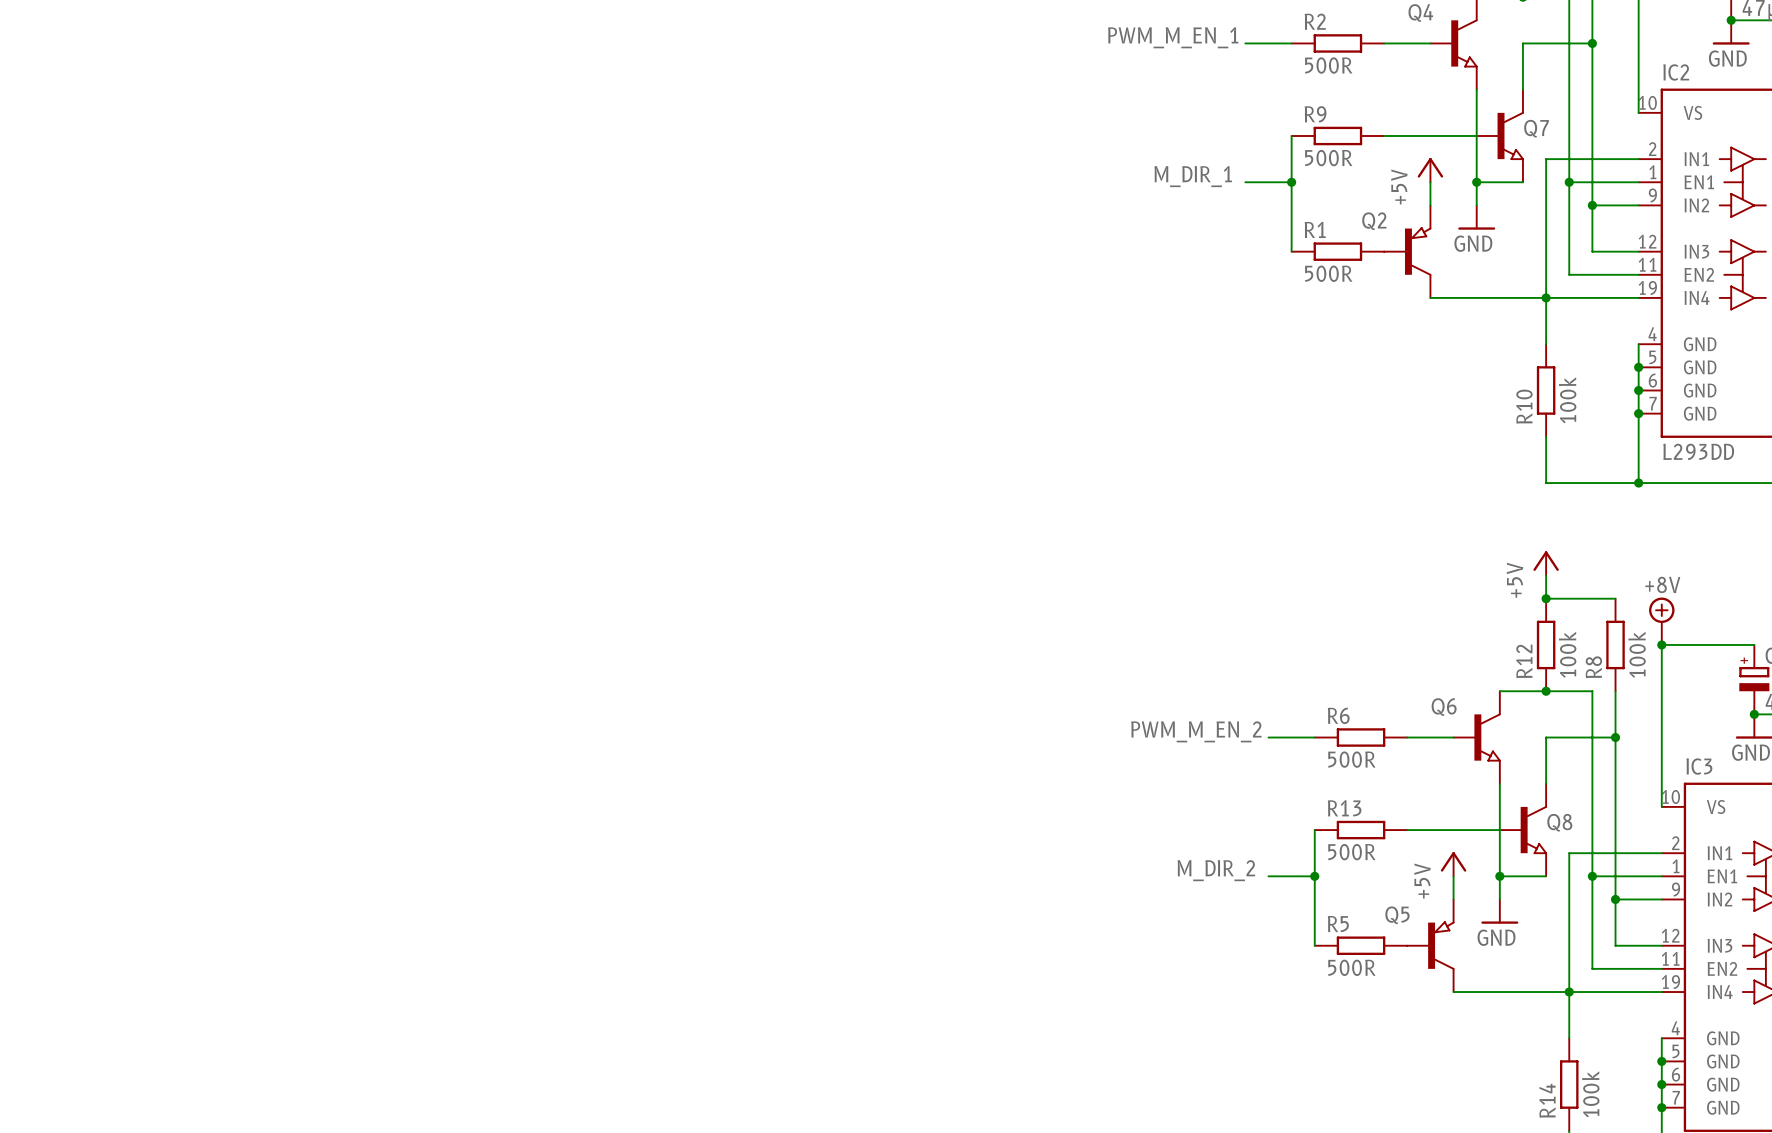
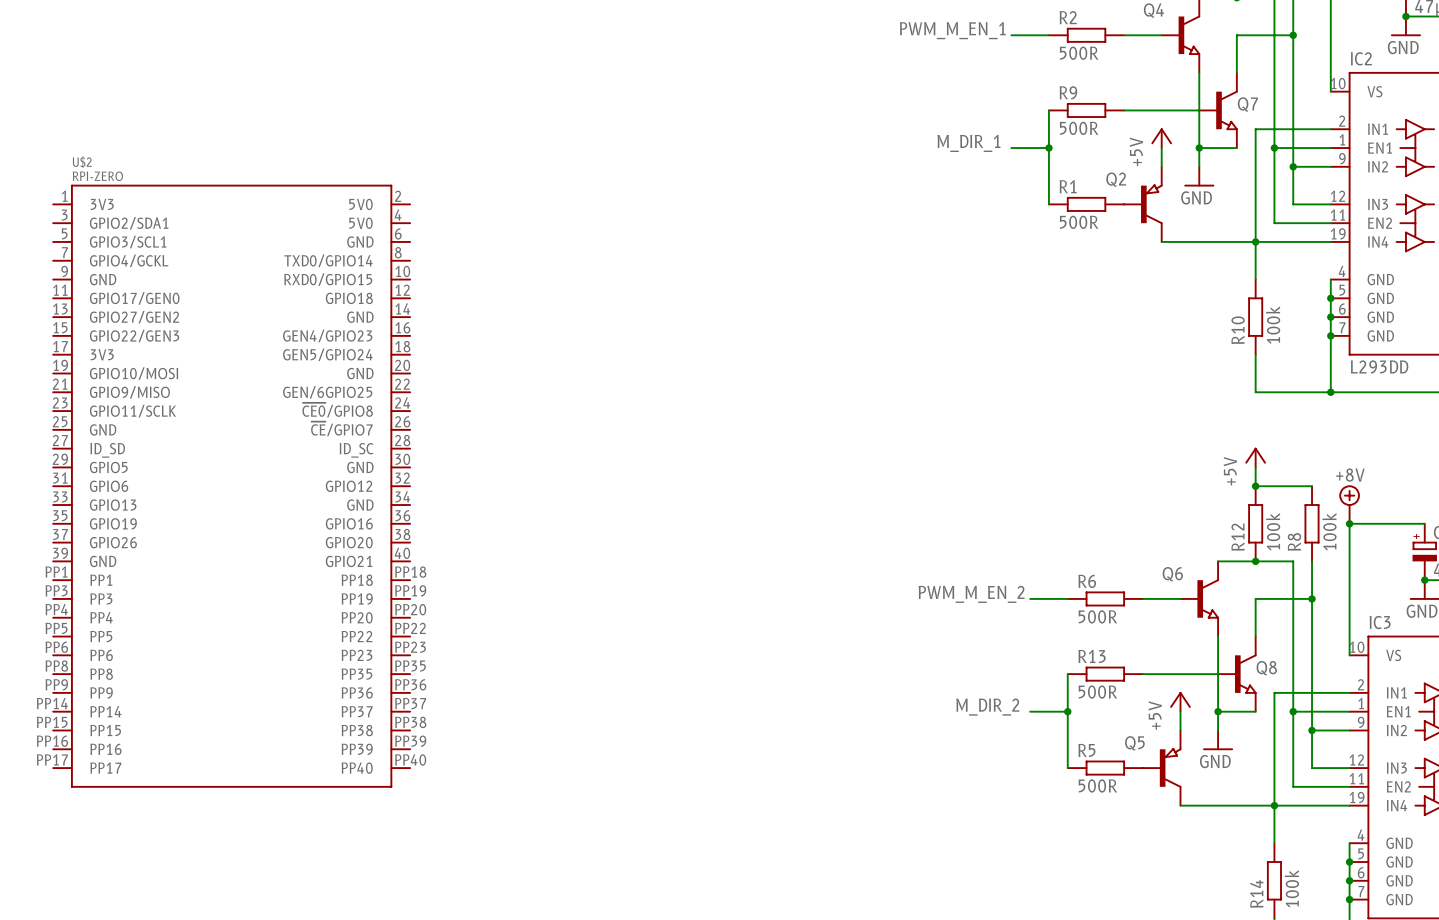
U$2: none -> RPI-ZERO (231, 486)

